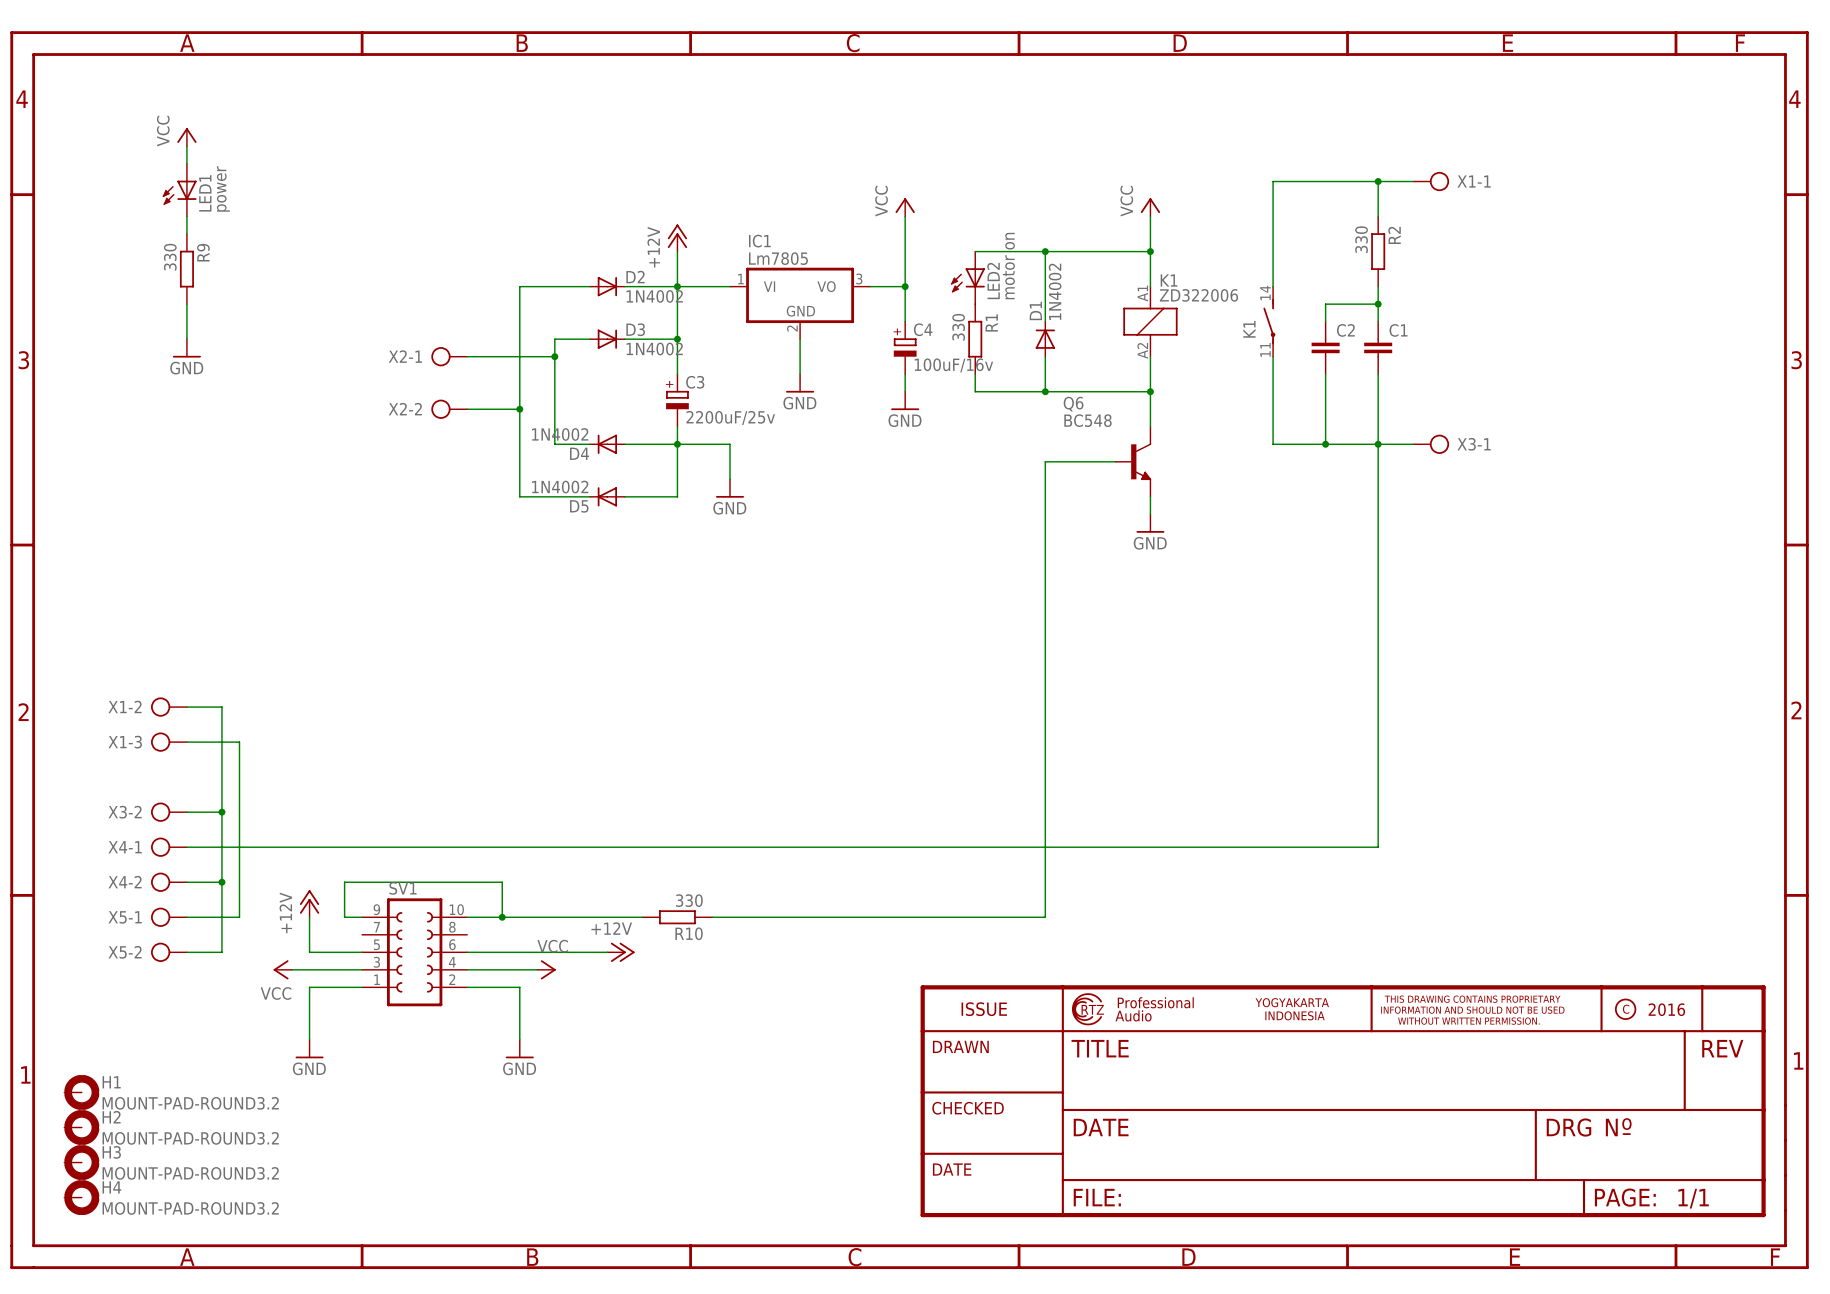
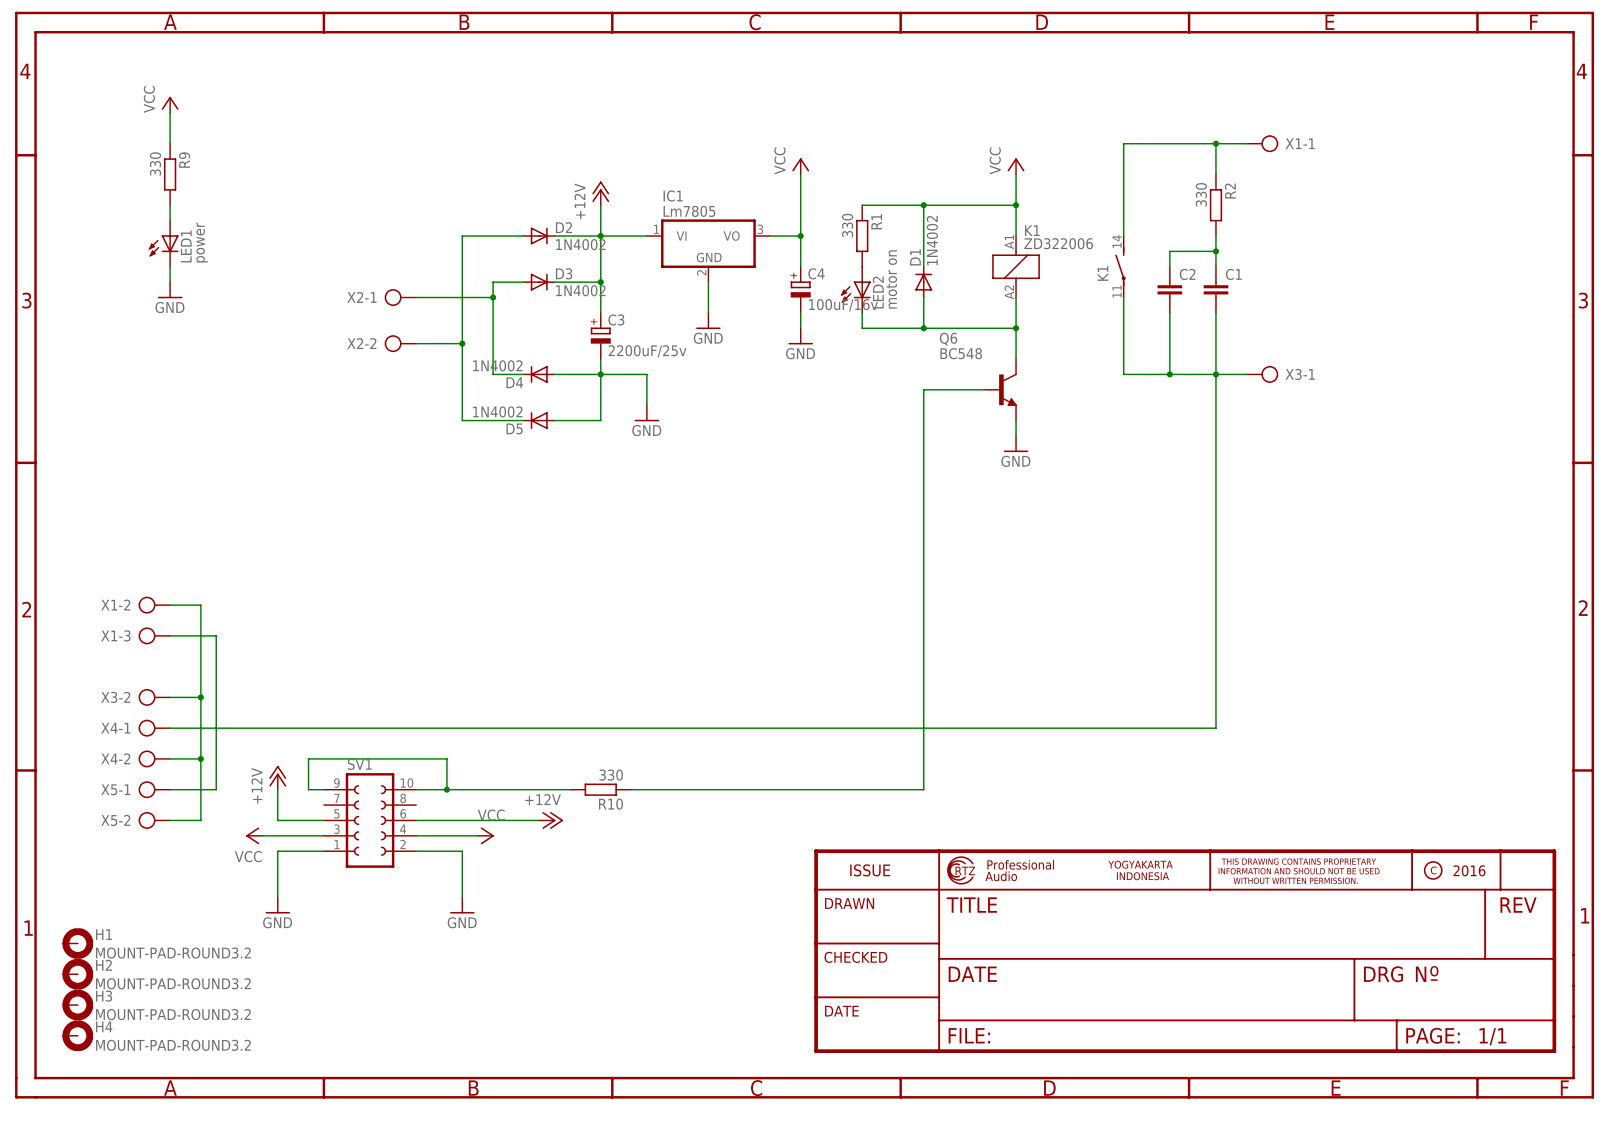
LED1 position: (179, 190) -> (163, 243)
wire: (186, 216) (186, 234) -> (170, 205) (170, 220)
R9 position: (186, 269) -> (170, 174)
LED2 position: (967, 277) -> (855, 289)
R1 position: (975, 339) -> (862, 236)

